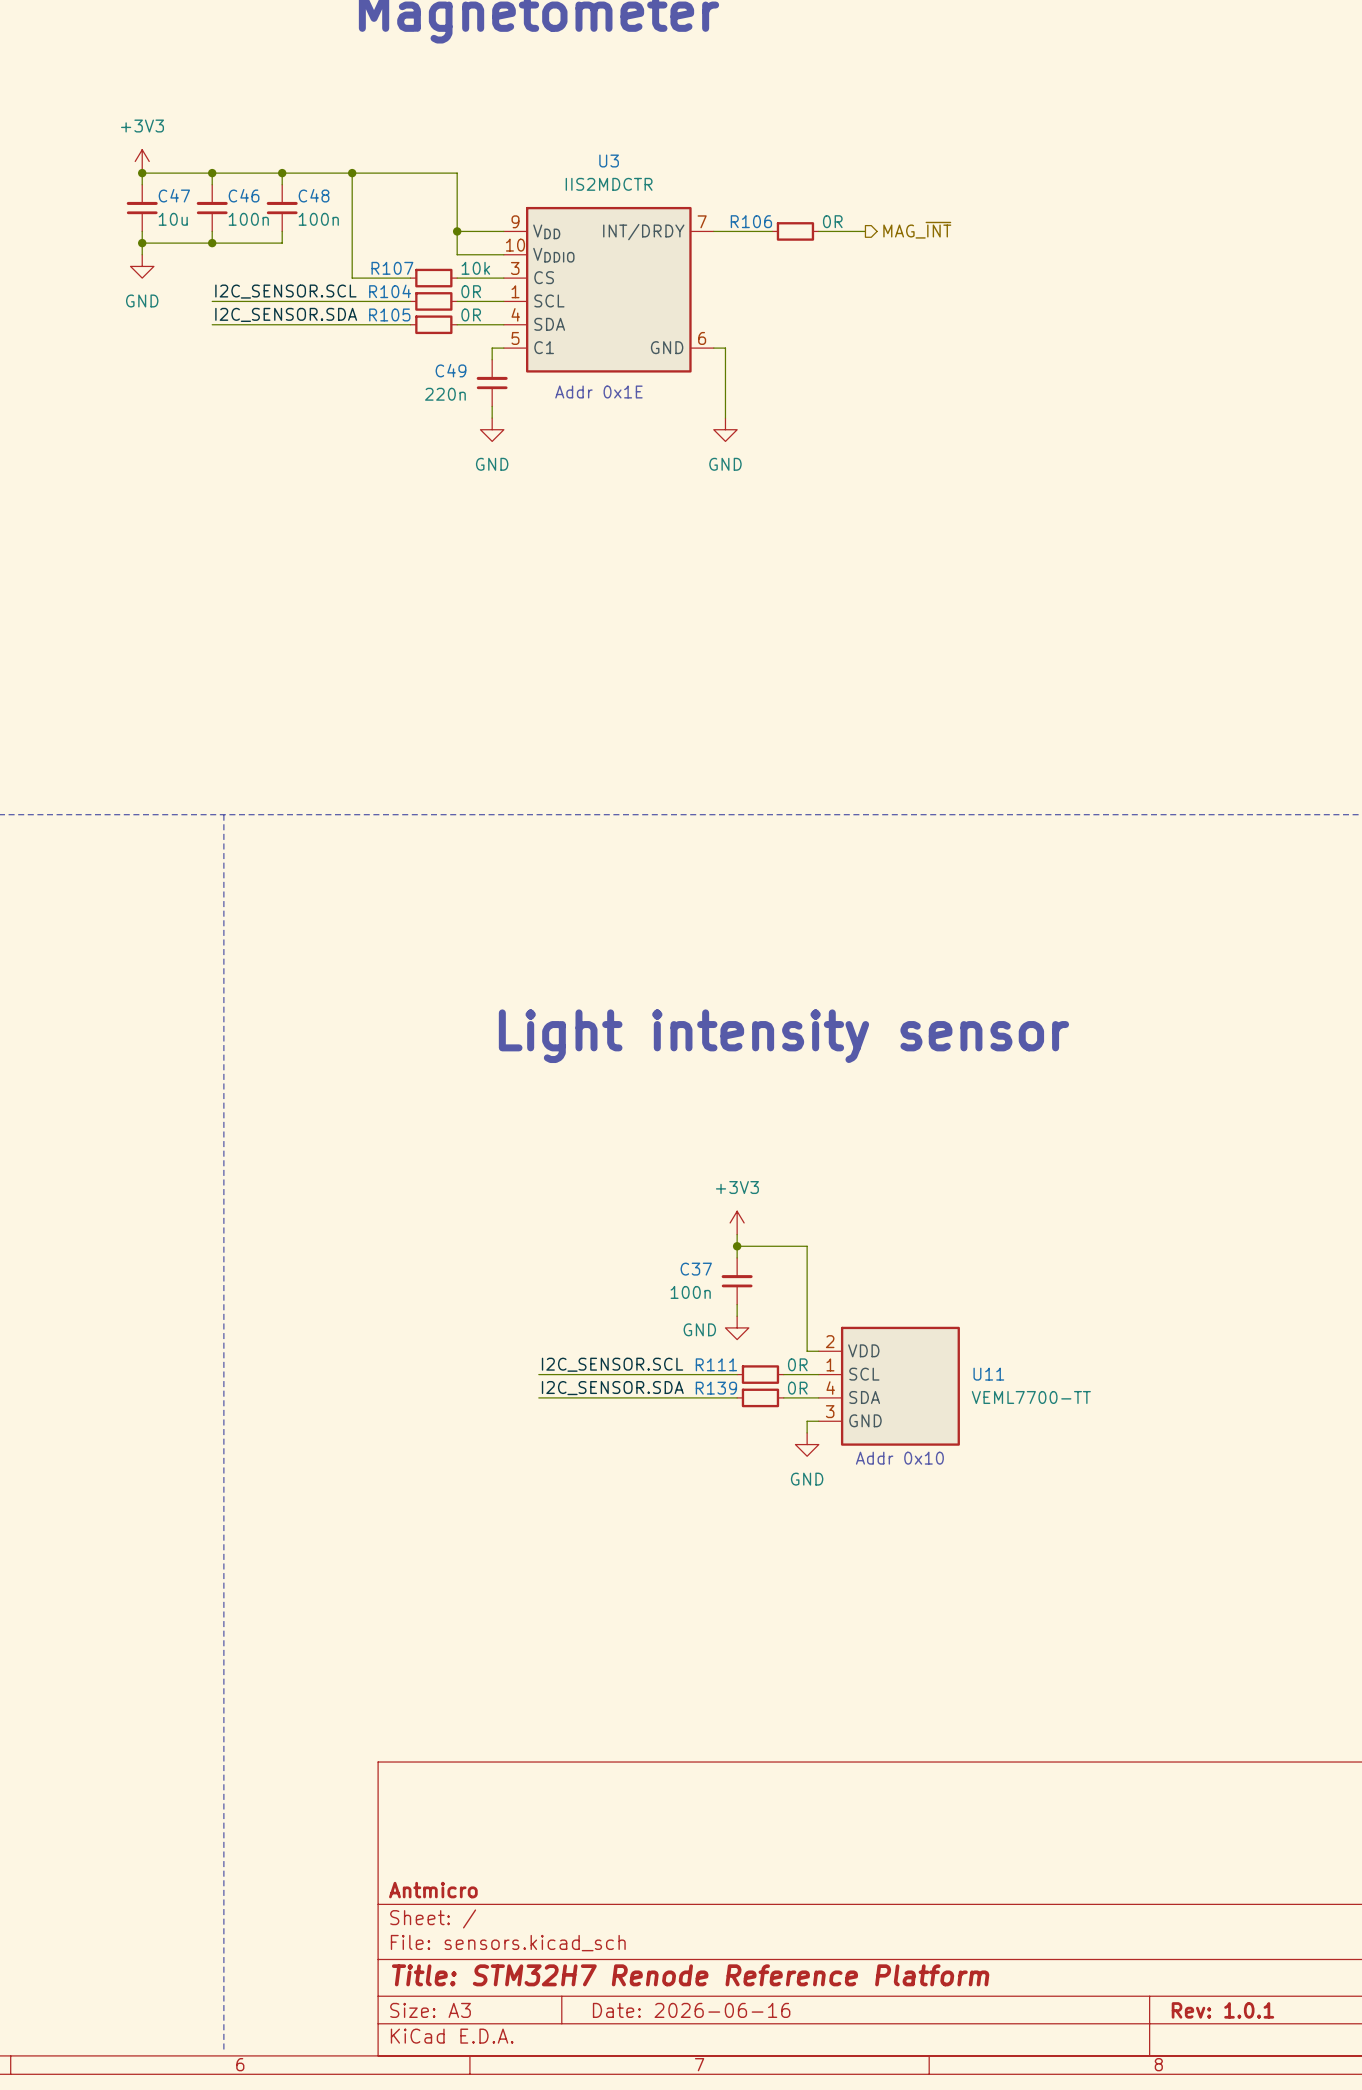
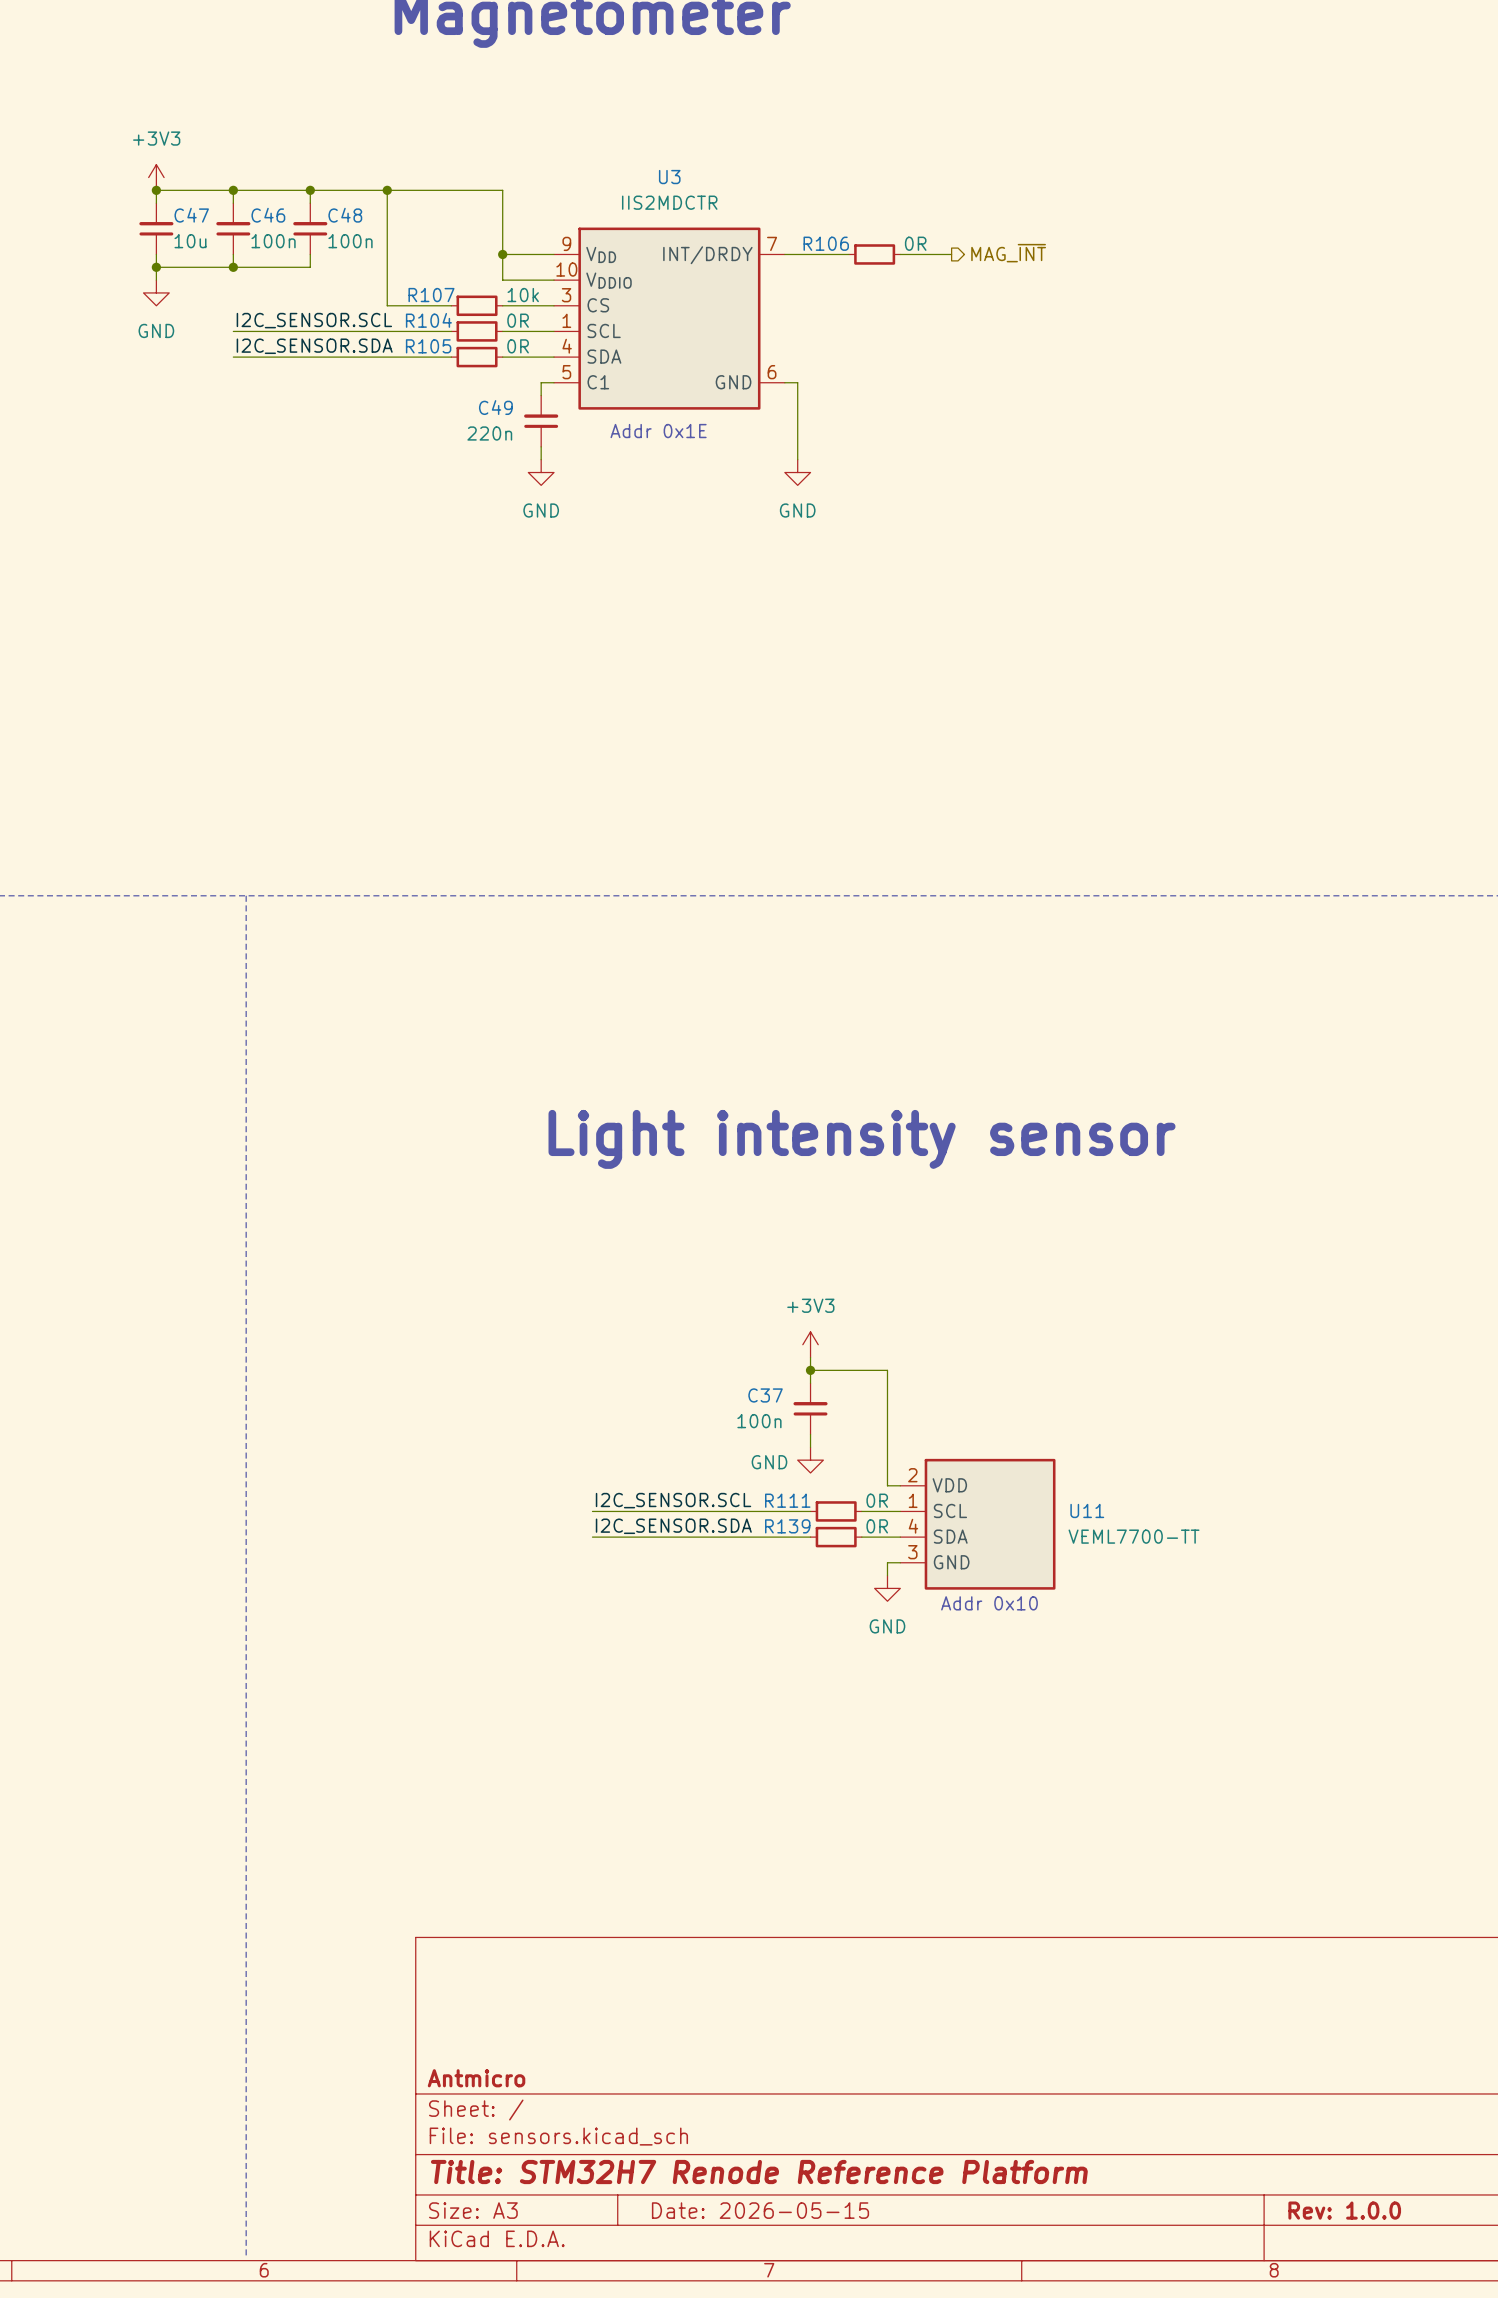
title block: Date: 2026-06-16 (691, 2010) -> Date: 2026-05-15 (760, 2210)
title block: Rev: 1.0.1 (1222, 2010) -> Rev: 1.0.0 (1344, 2210)

